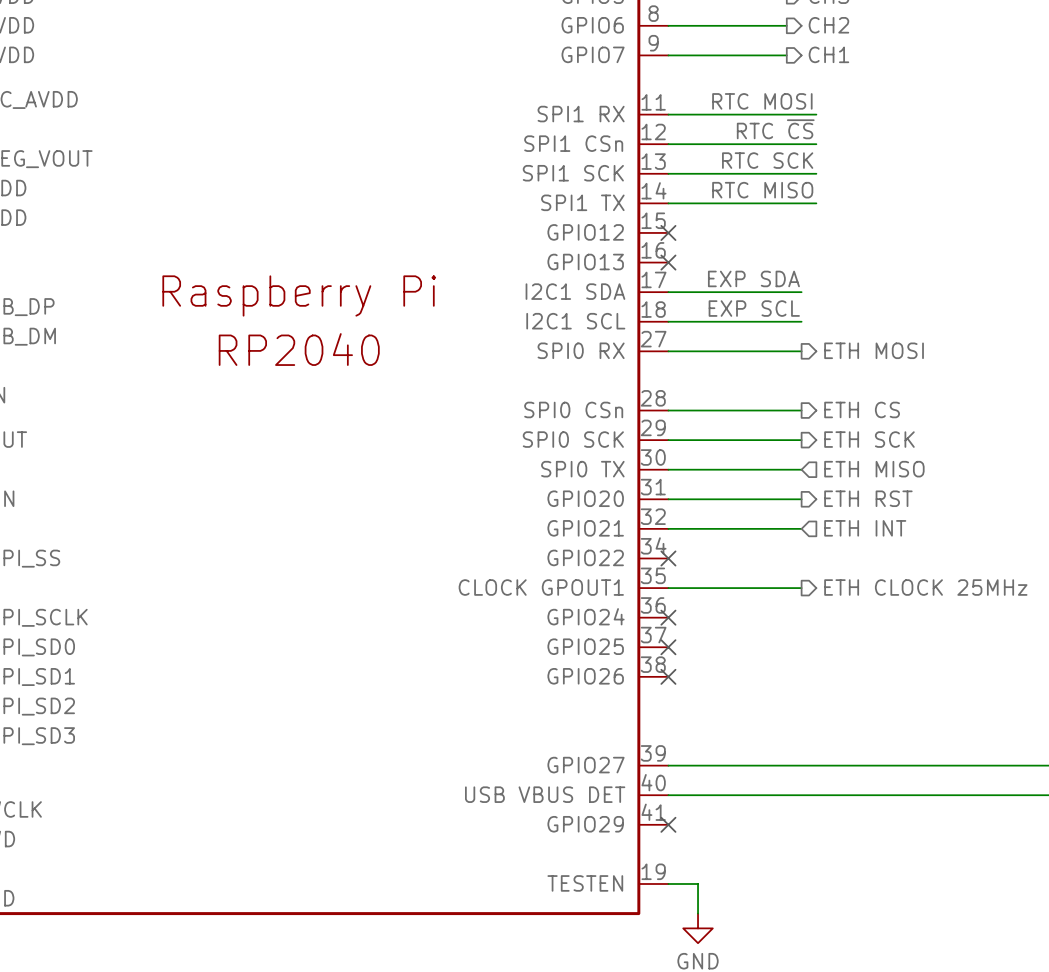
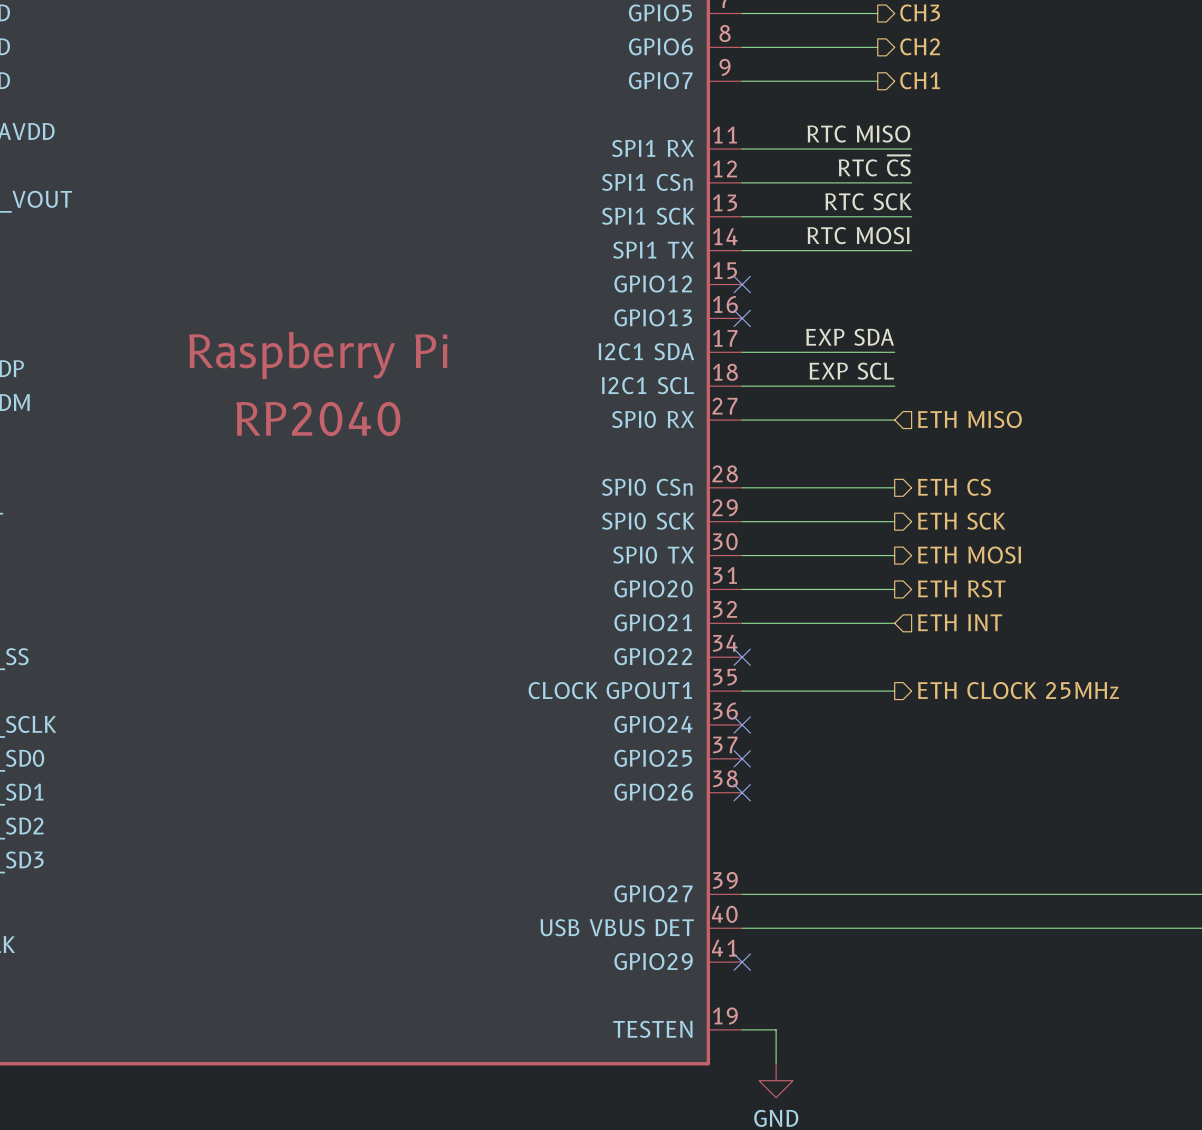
label: RTC MOSI (762, 101) -> RTC MISO (858, 133)
label: RTC MISO (762, 190) -> RTC MOSI (858, 235)
hierarchical label shape: output (874, 350) -> input (969, 419)
hierarchical label: ETH MOSI (874, 350) -> ETH MISO (969, 419)
hierarchical label shape: input (874, 469) -> output (969, 555)
hierarchical label: ETH MISO (874, 469) -> ETH MOSI (969, 555)

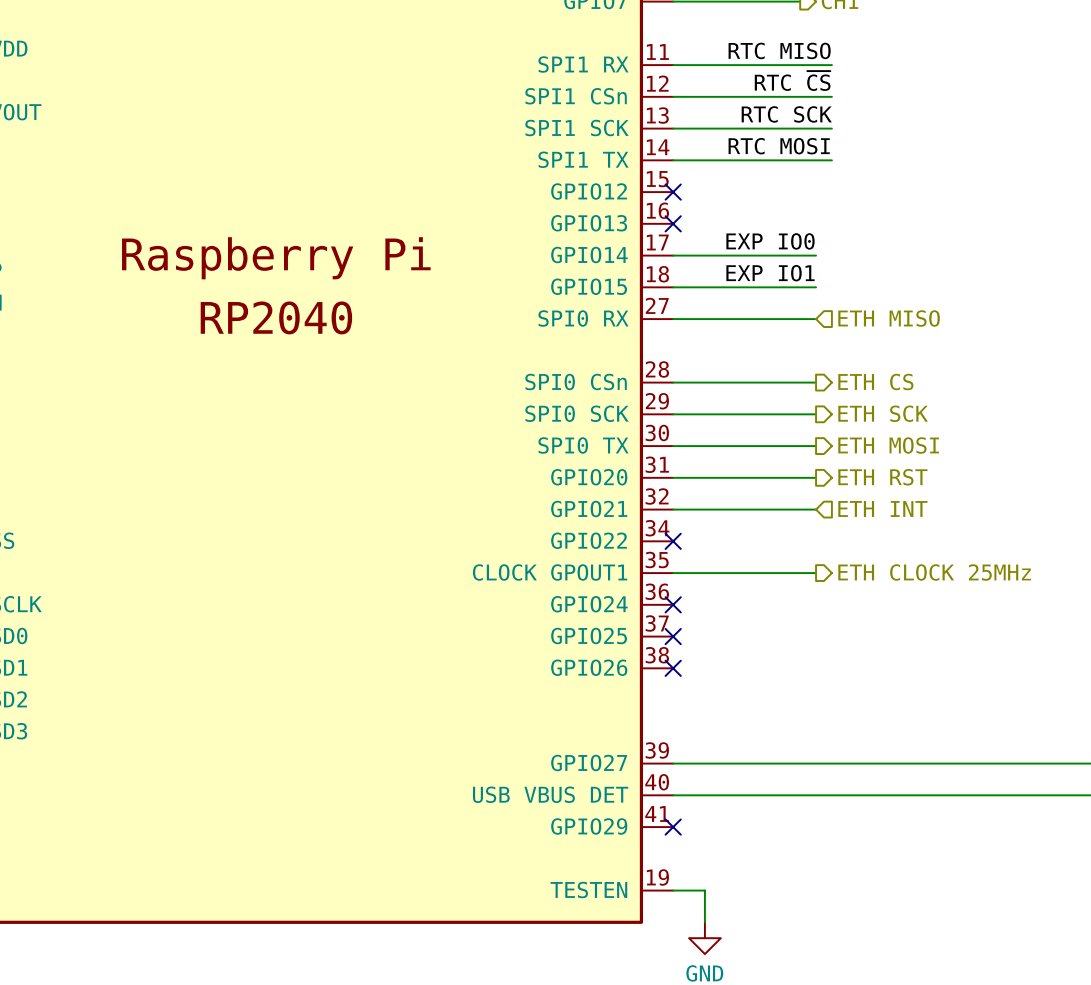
label: EXP SDA (850, 337) -> EXP IO0 (770, 241)
part pin name: I2C1 SDA (646, 351) -> GPIO14 (589, 255)
label: EXP SCL (851, 371) -> EXP IO1 (770, 273)
part pin name: I2C1 SCL (647, 385) -> GPIO15 (589, 286)

